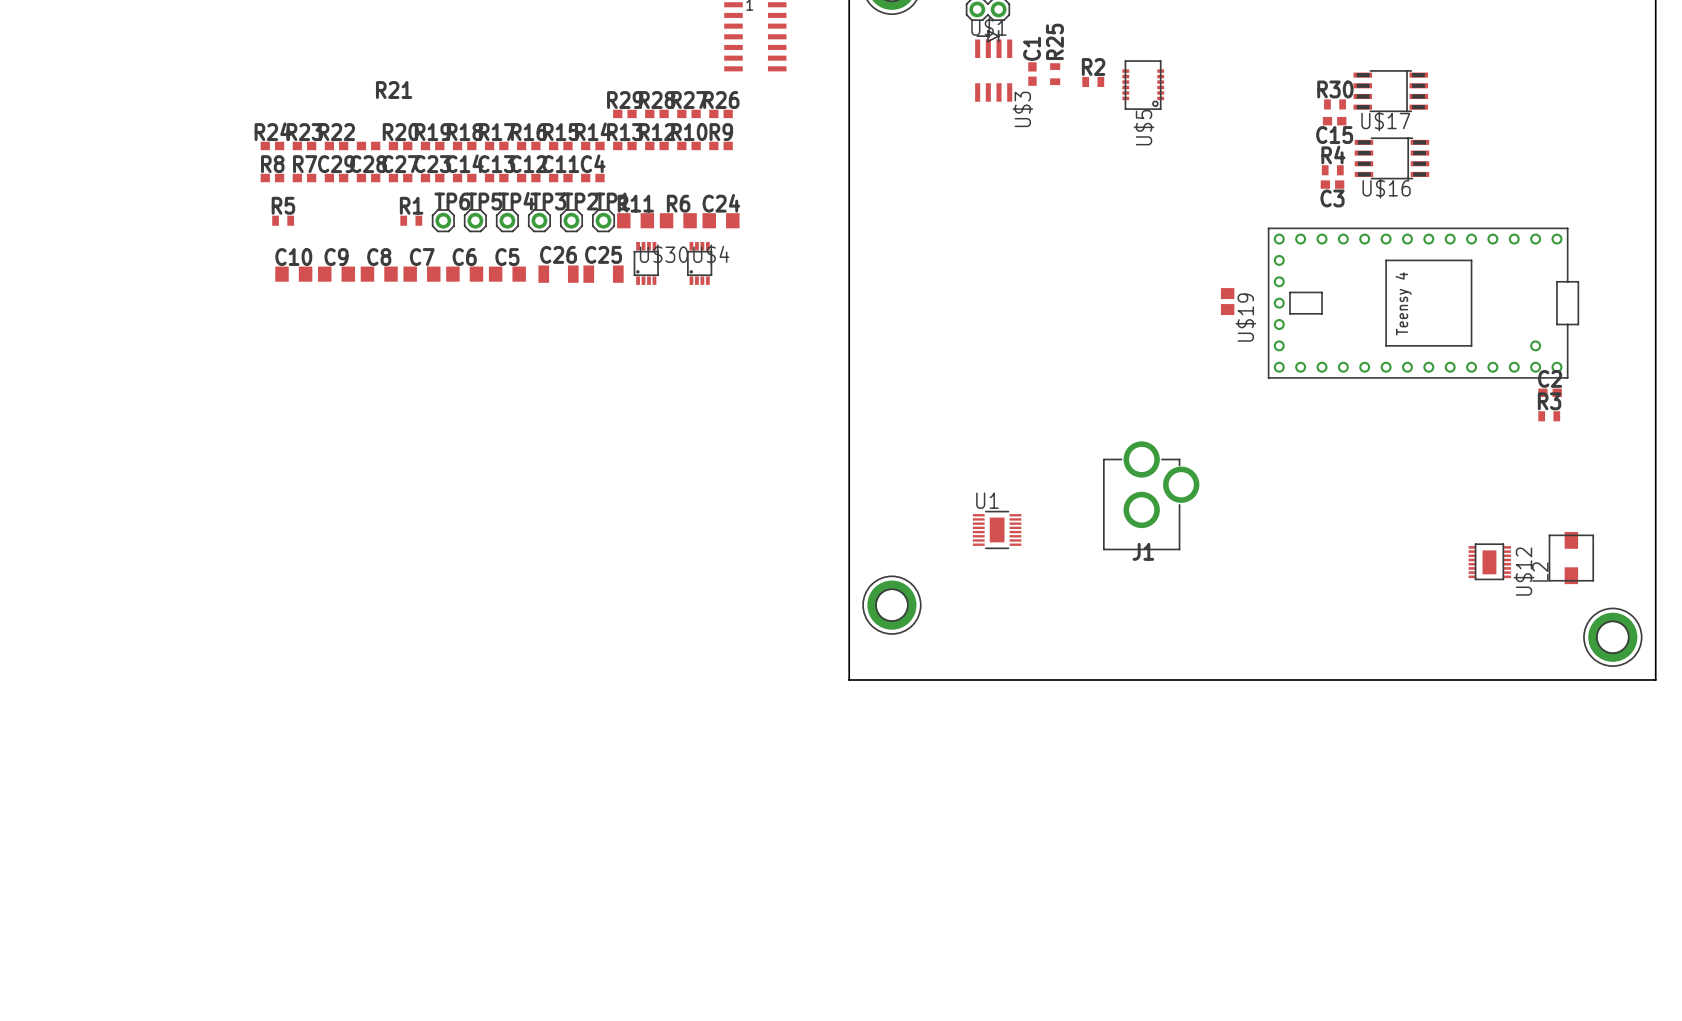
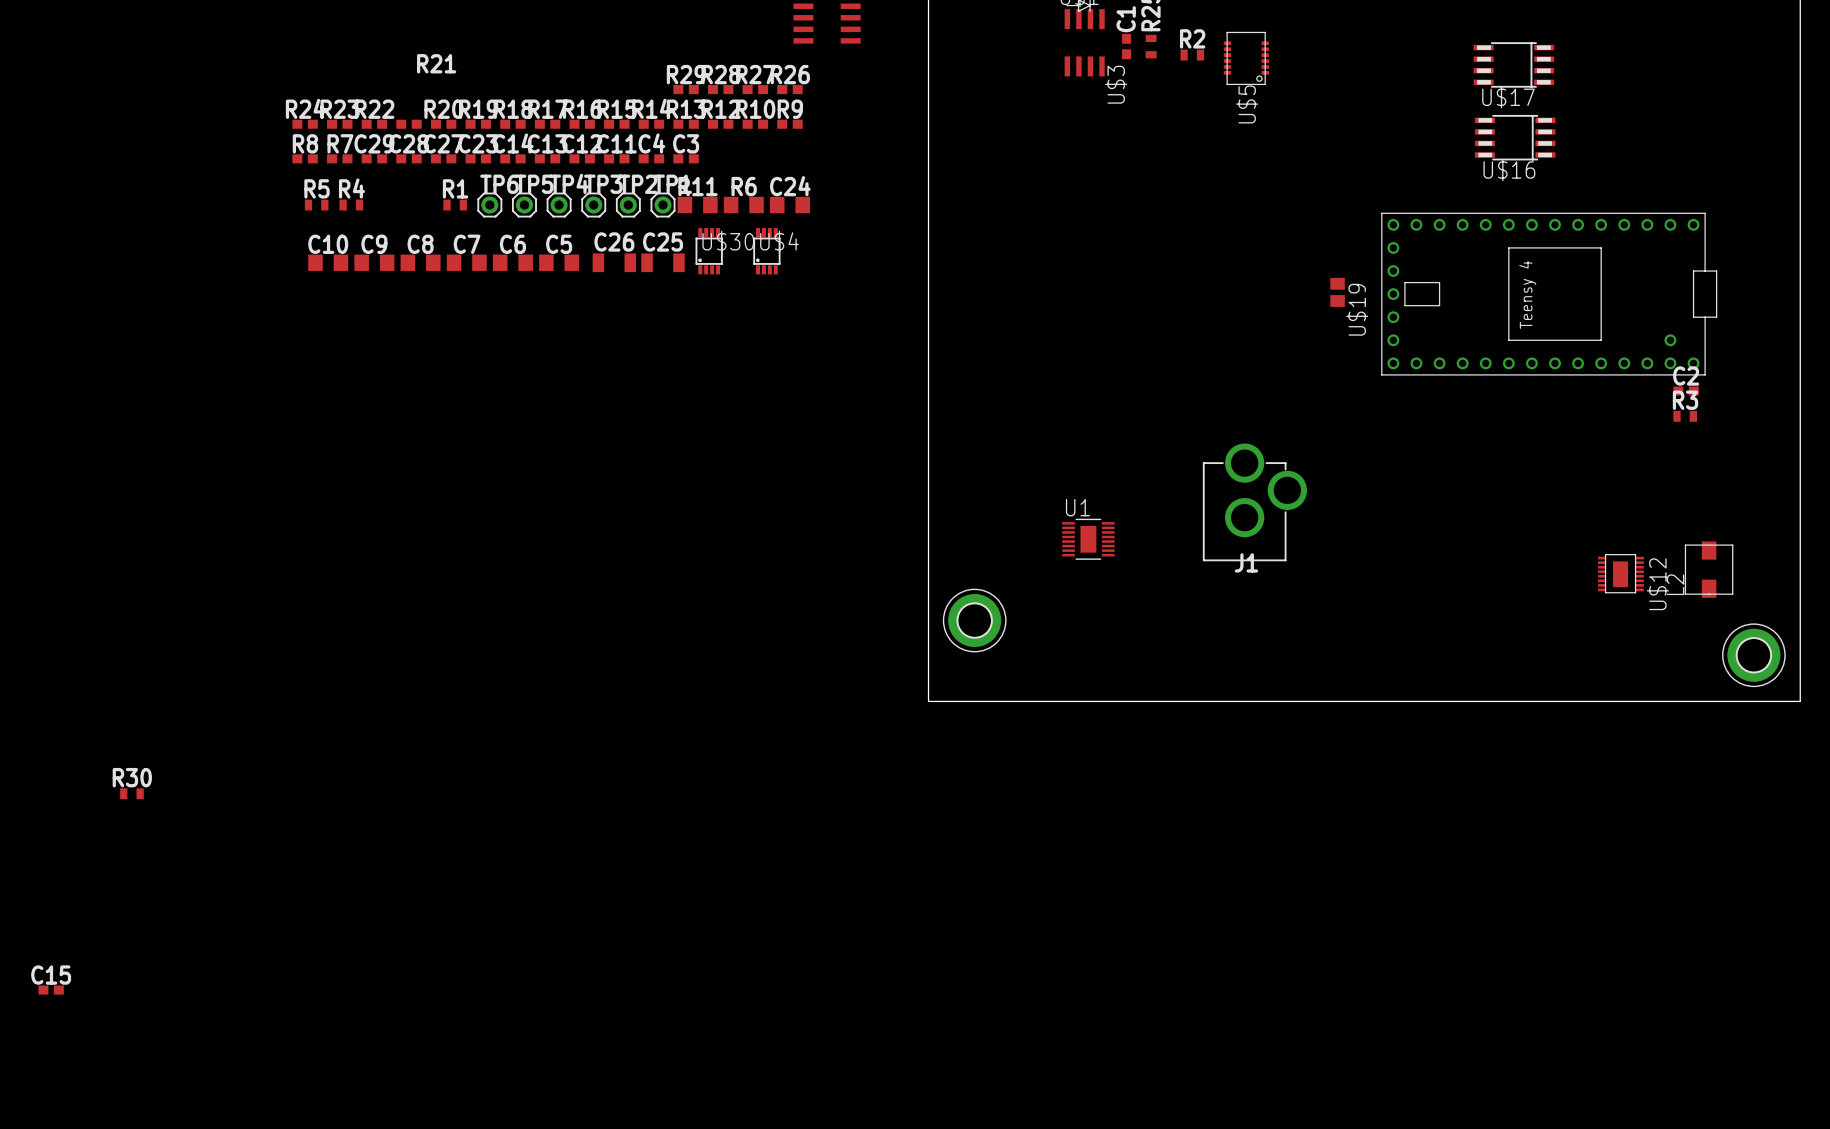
R30 position: (1335, 104) -> (131, 793)
C15 position: (1334, 121) -> (51, 990)
C15 name position: C15 (1334, 135) -> C15 (51, 975)
R4 position: (1332, 170) -> (351, 205)
C3 position: (1332, 184) -> (686, 158)
C3 name position: C3 (1332, 198) -> C3 (686, 143)

